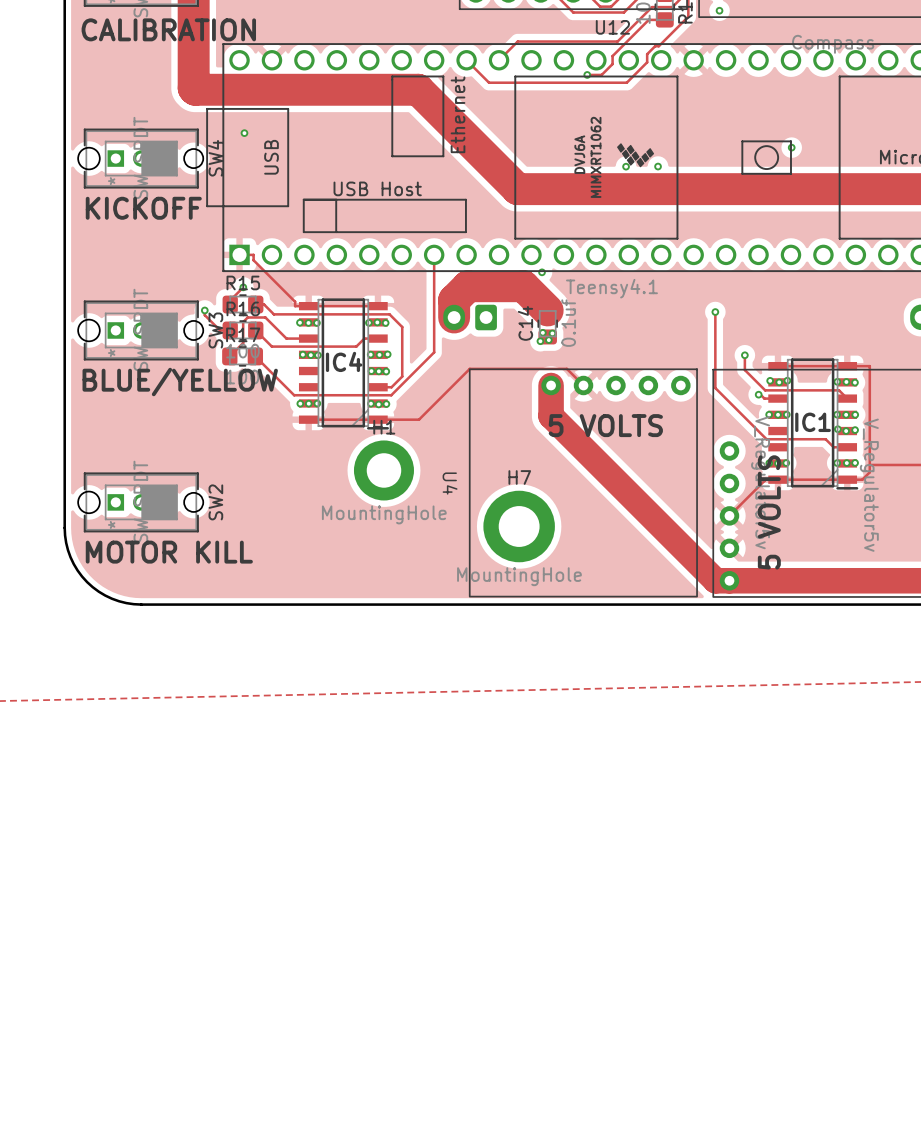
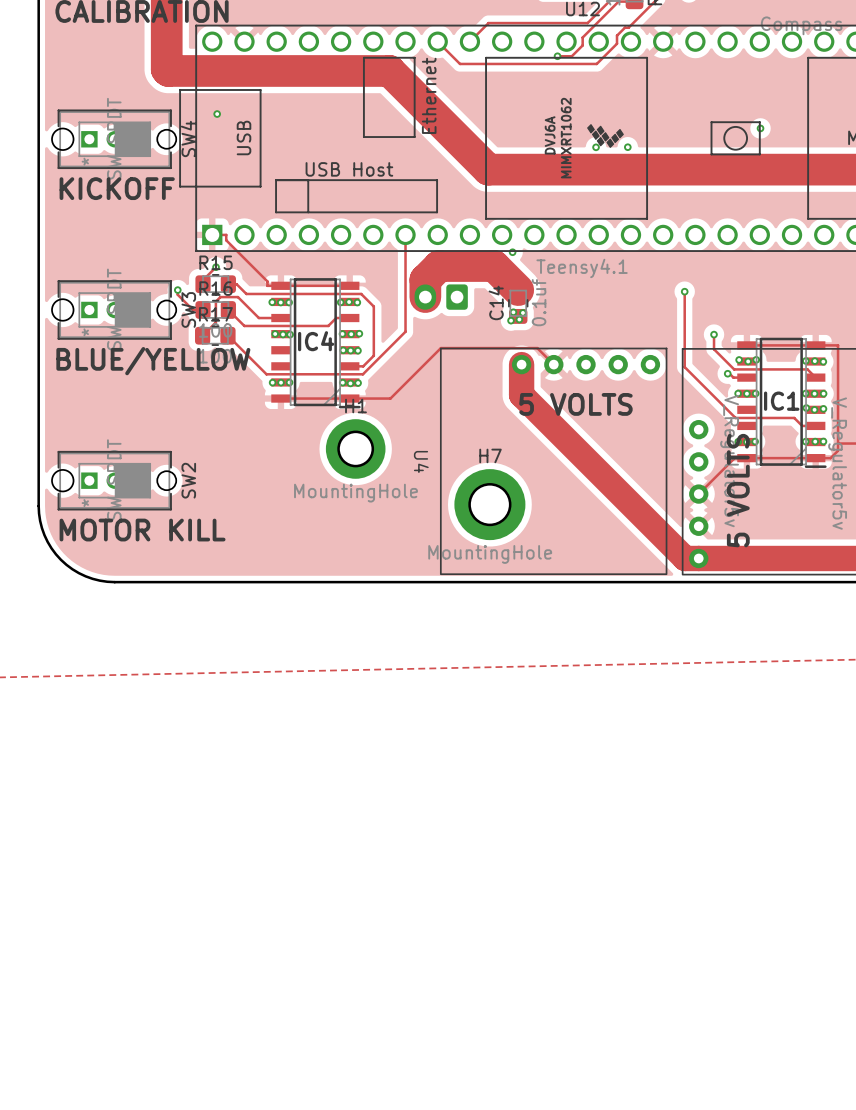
round board edge: none -> [337, 430, 375, 468]
round board edge: none -> [468, 483, 512, 527]

